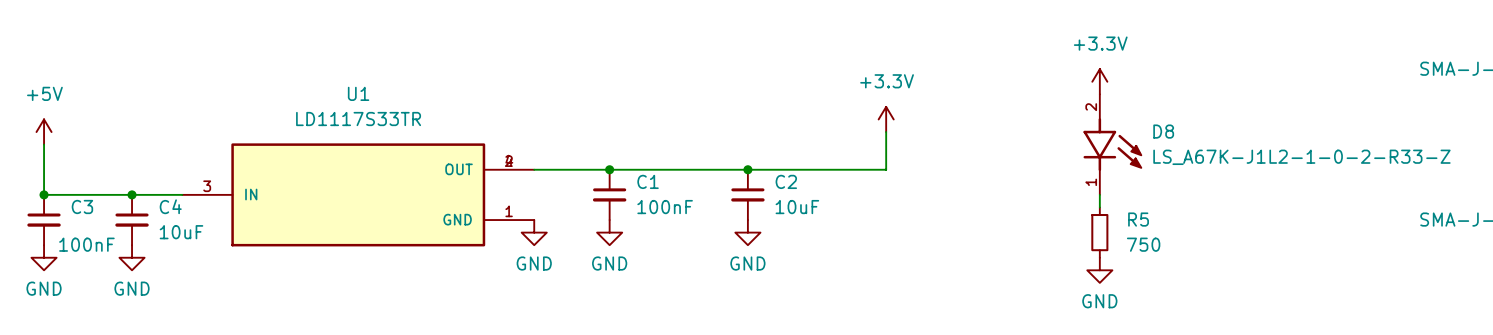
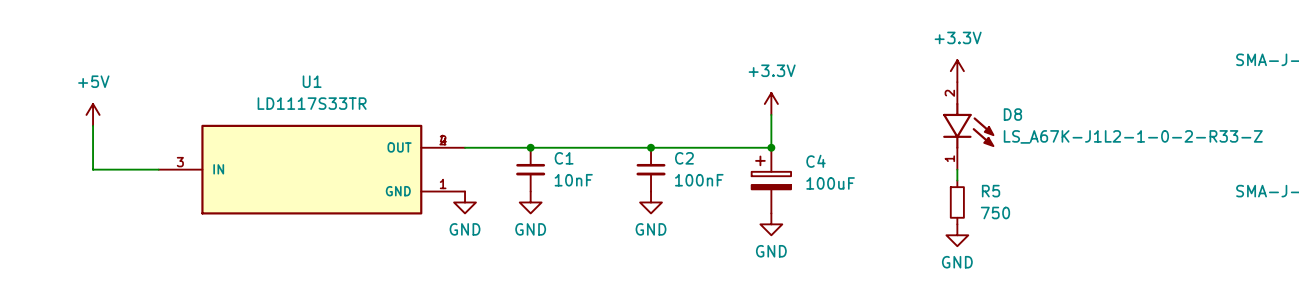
power symbol position: +5V (44, 132) -> +5V (93, 114)
wire: (44, 144) (44, 194) (106, 194) -> (93, 125) (93, 169)
junction: none -> (771, 147)
junction: (44, 194) -> none
C4 symbol: [115, 194, 149, 246] -> [751, 147, 792, 214]
junction: (132, 194) -> none
C1 value: 100nF (665, 207) -> 10nF (573, 180)
C2 value: 10uF (797, 207) -> 100nF (699, 180)
C3: 100nF (44, 220) -> none
C4 value: 10uF (181, 232) -> 100uF (830, 183)
power symbol: GND (44, 257) -> none
power symbol: GND (132, 257) -> none
power symbol: none -> GND (771, 224)

